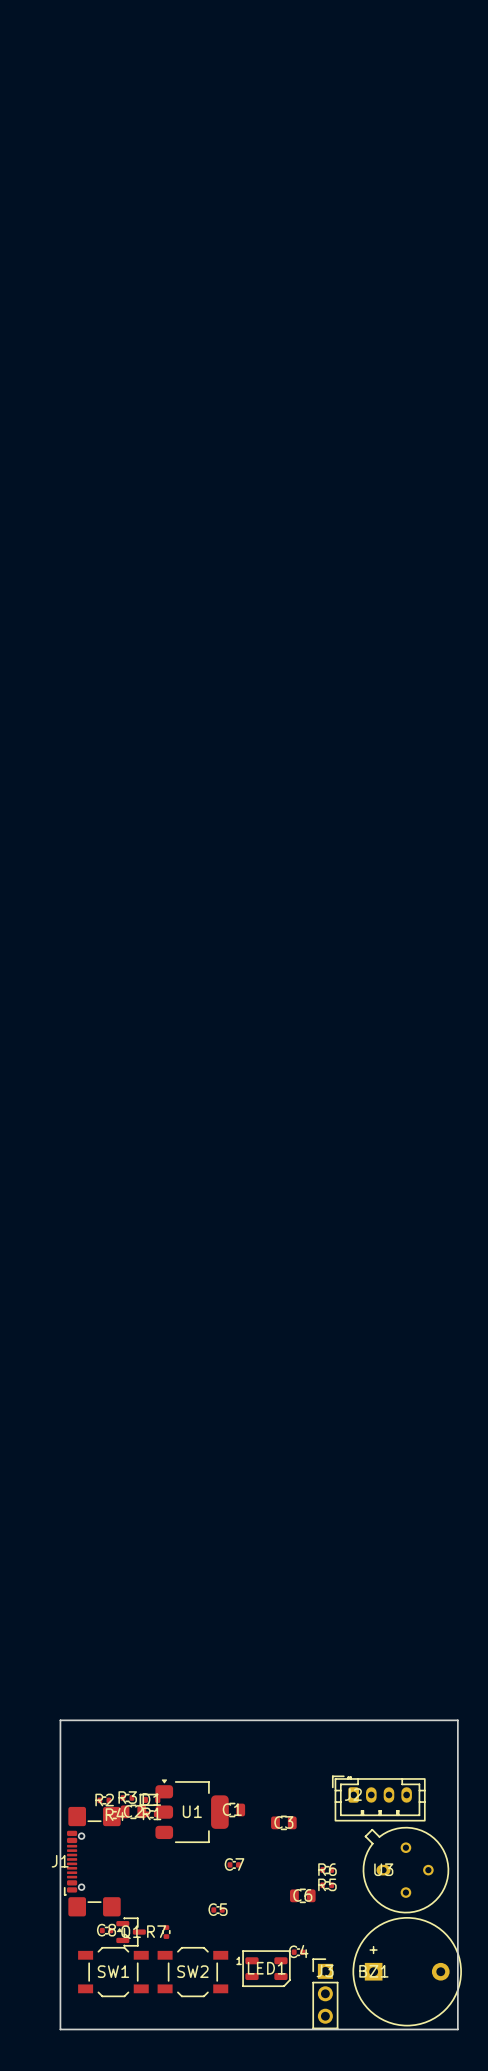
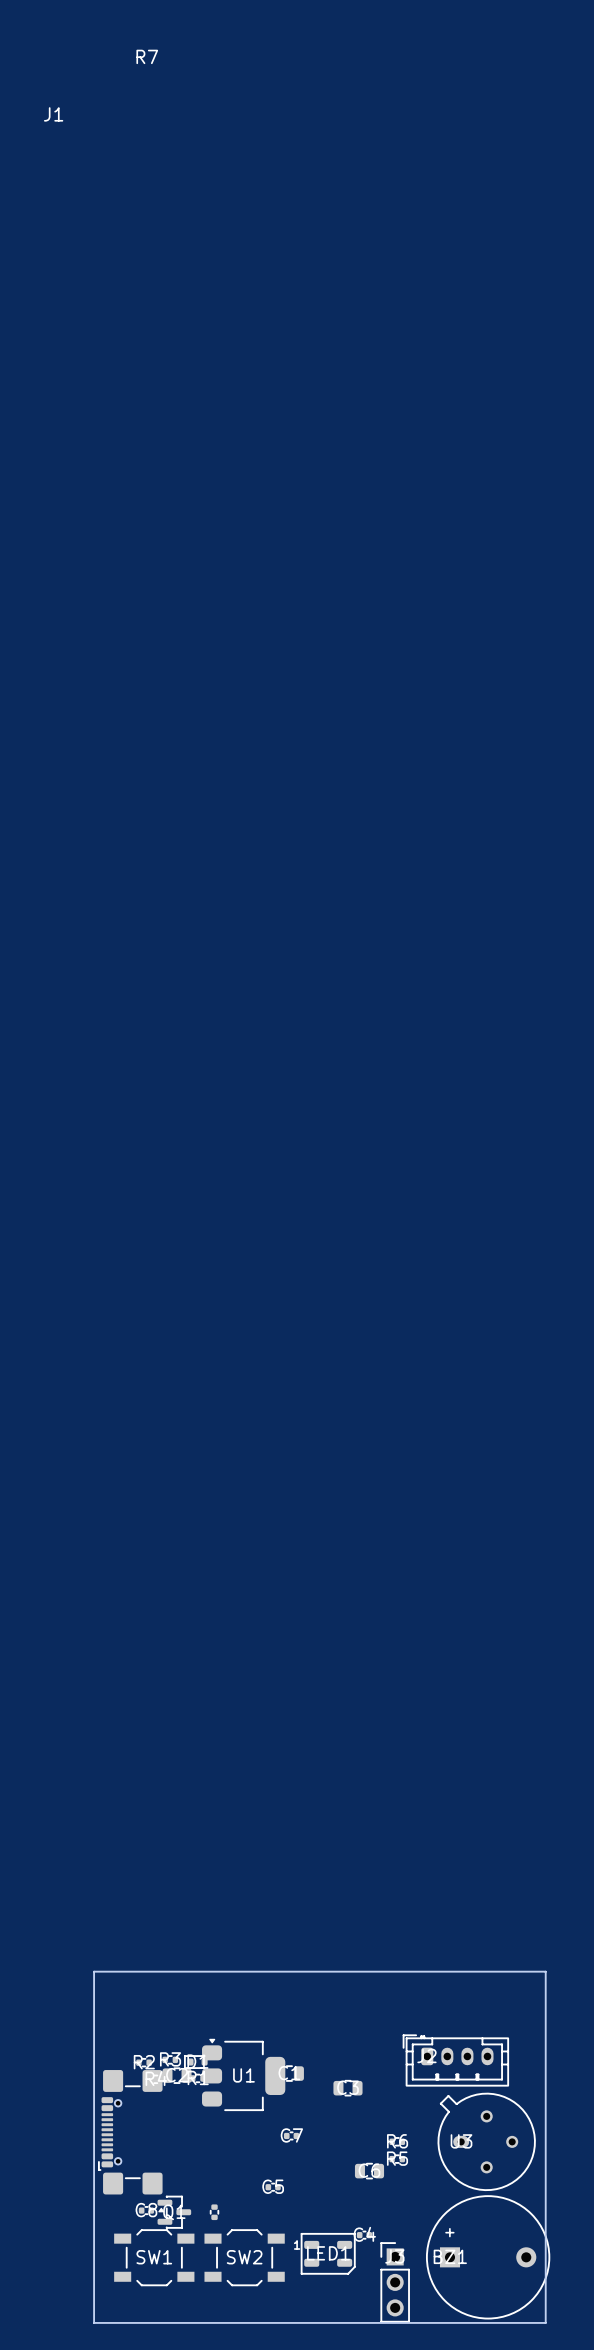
J1 name position: J1 (60, 1861) -> J1 (53, 114)
R7 name position: R7 (156, 1931) -> R7 (147, 56)

